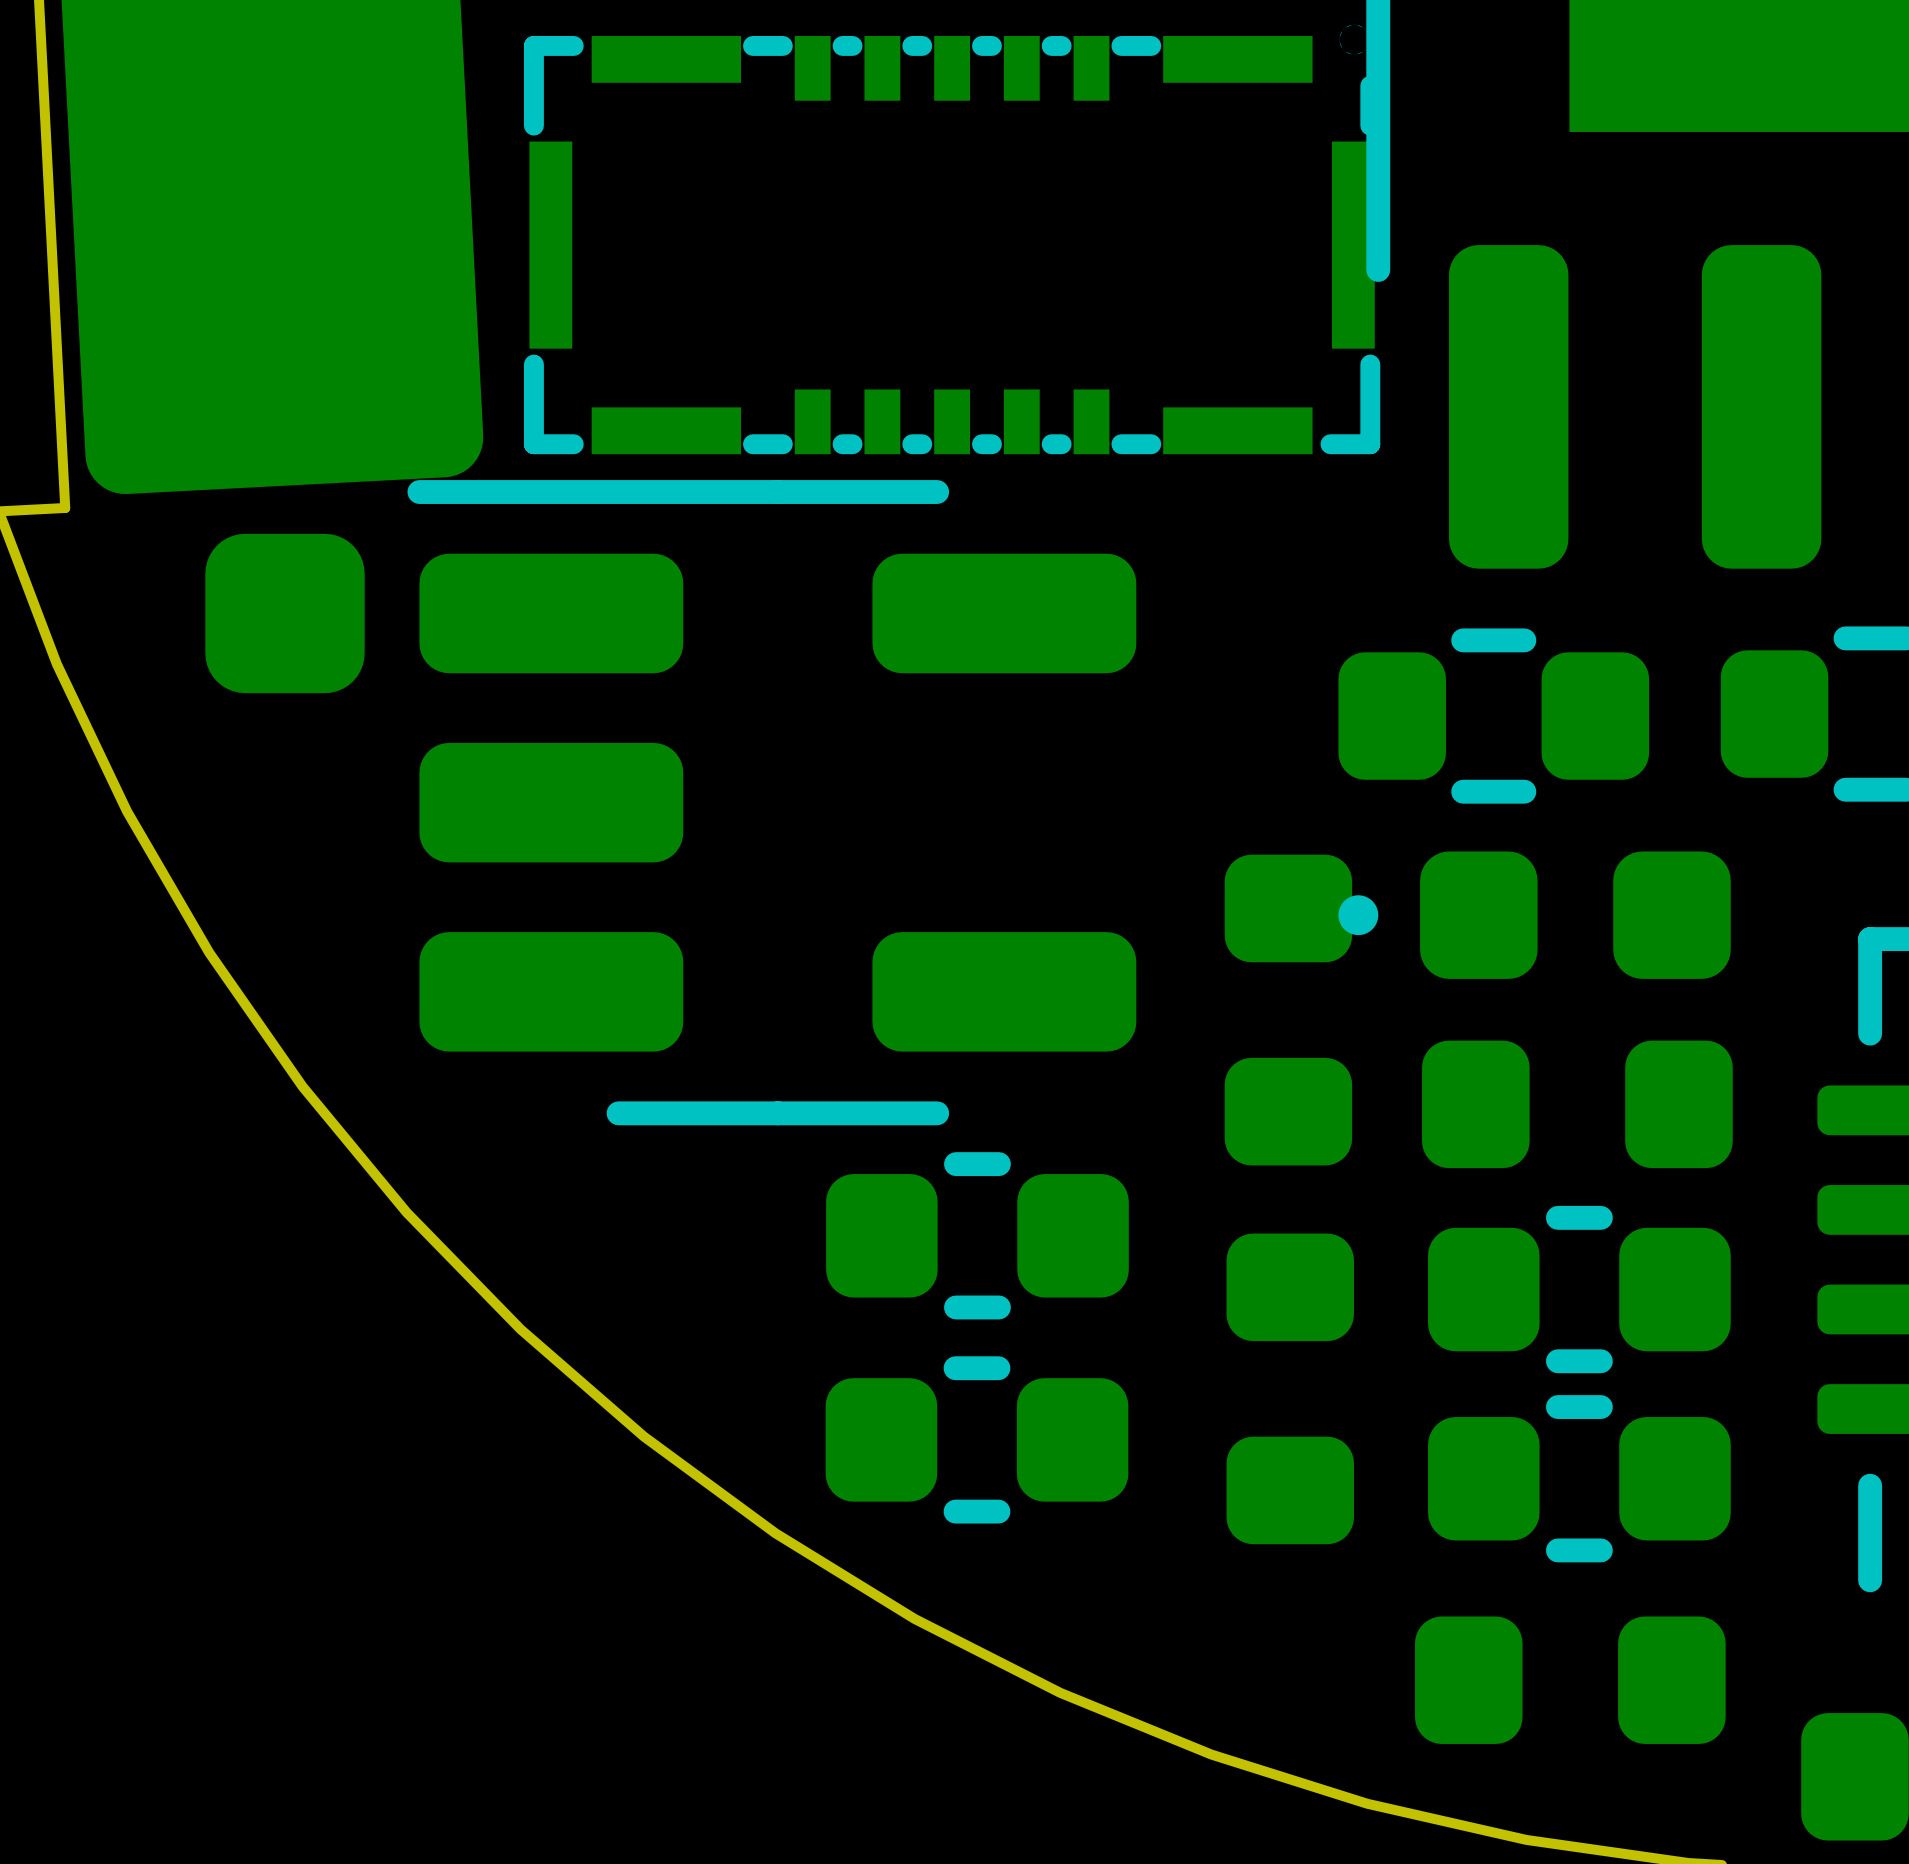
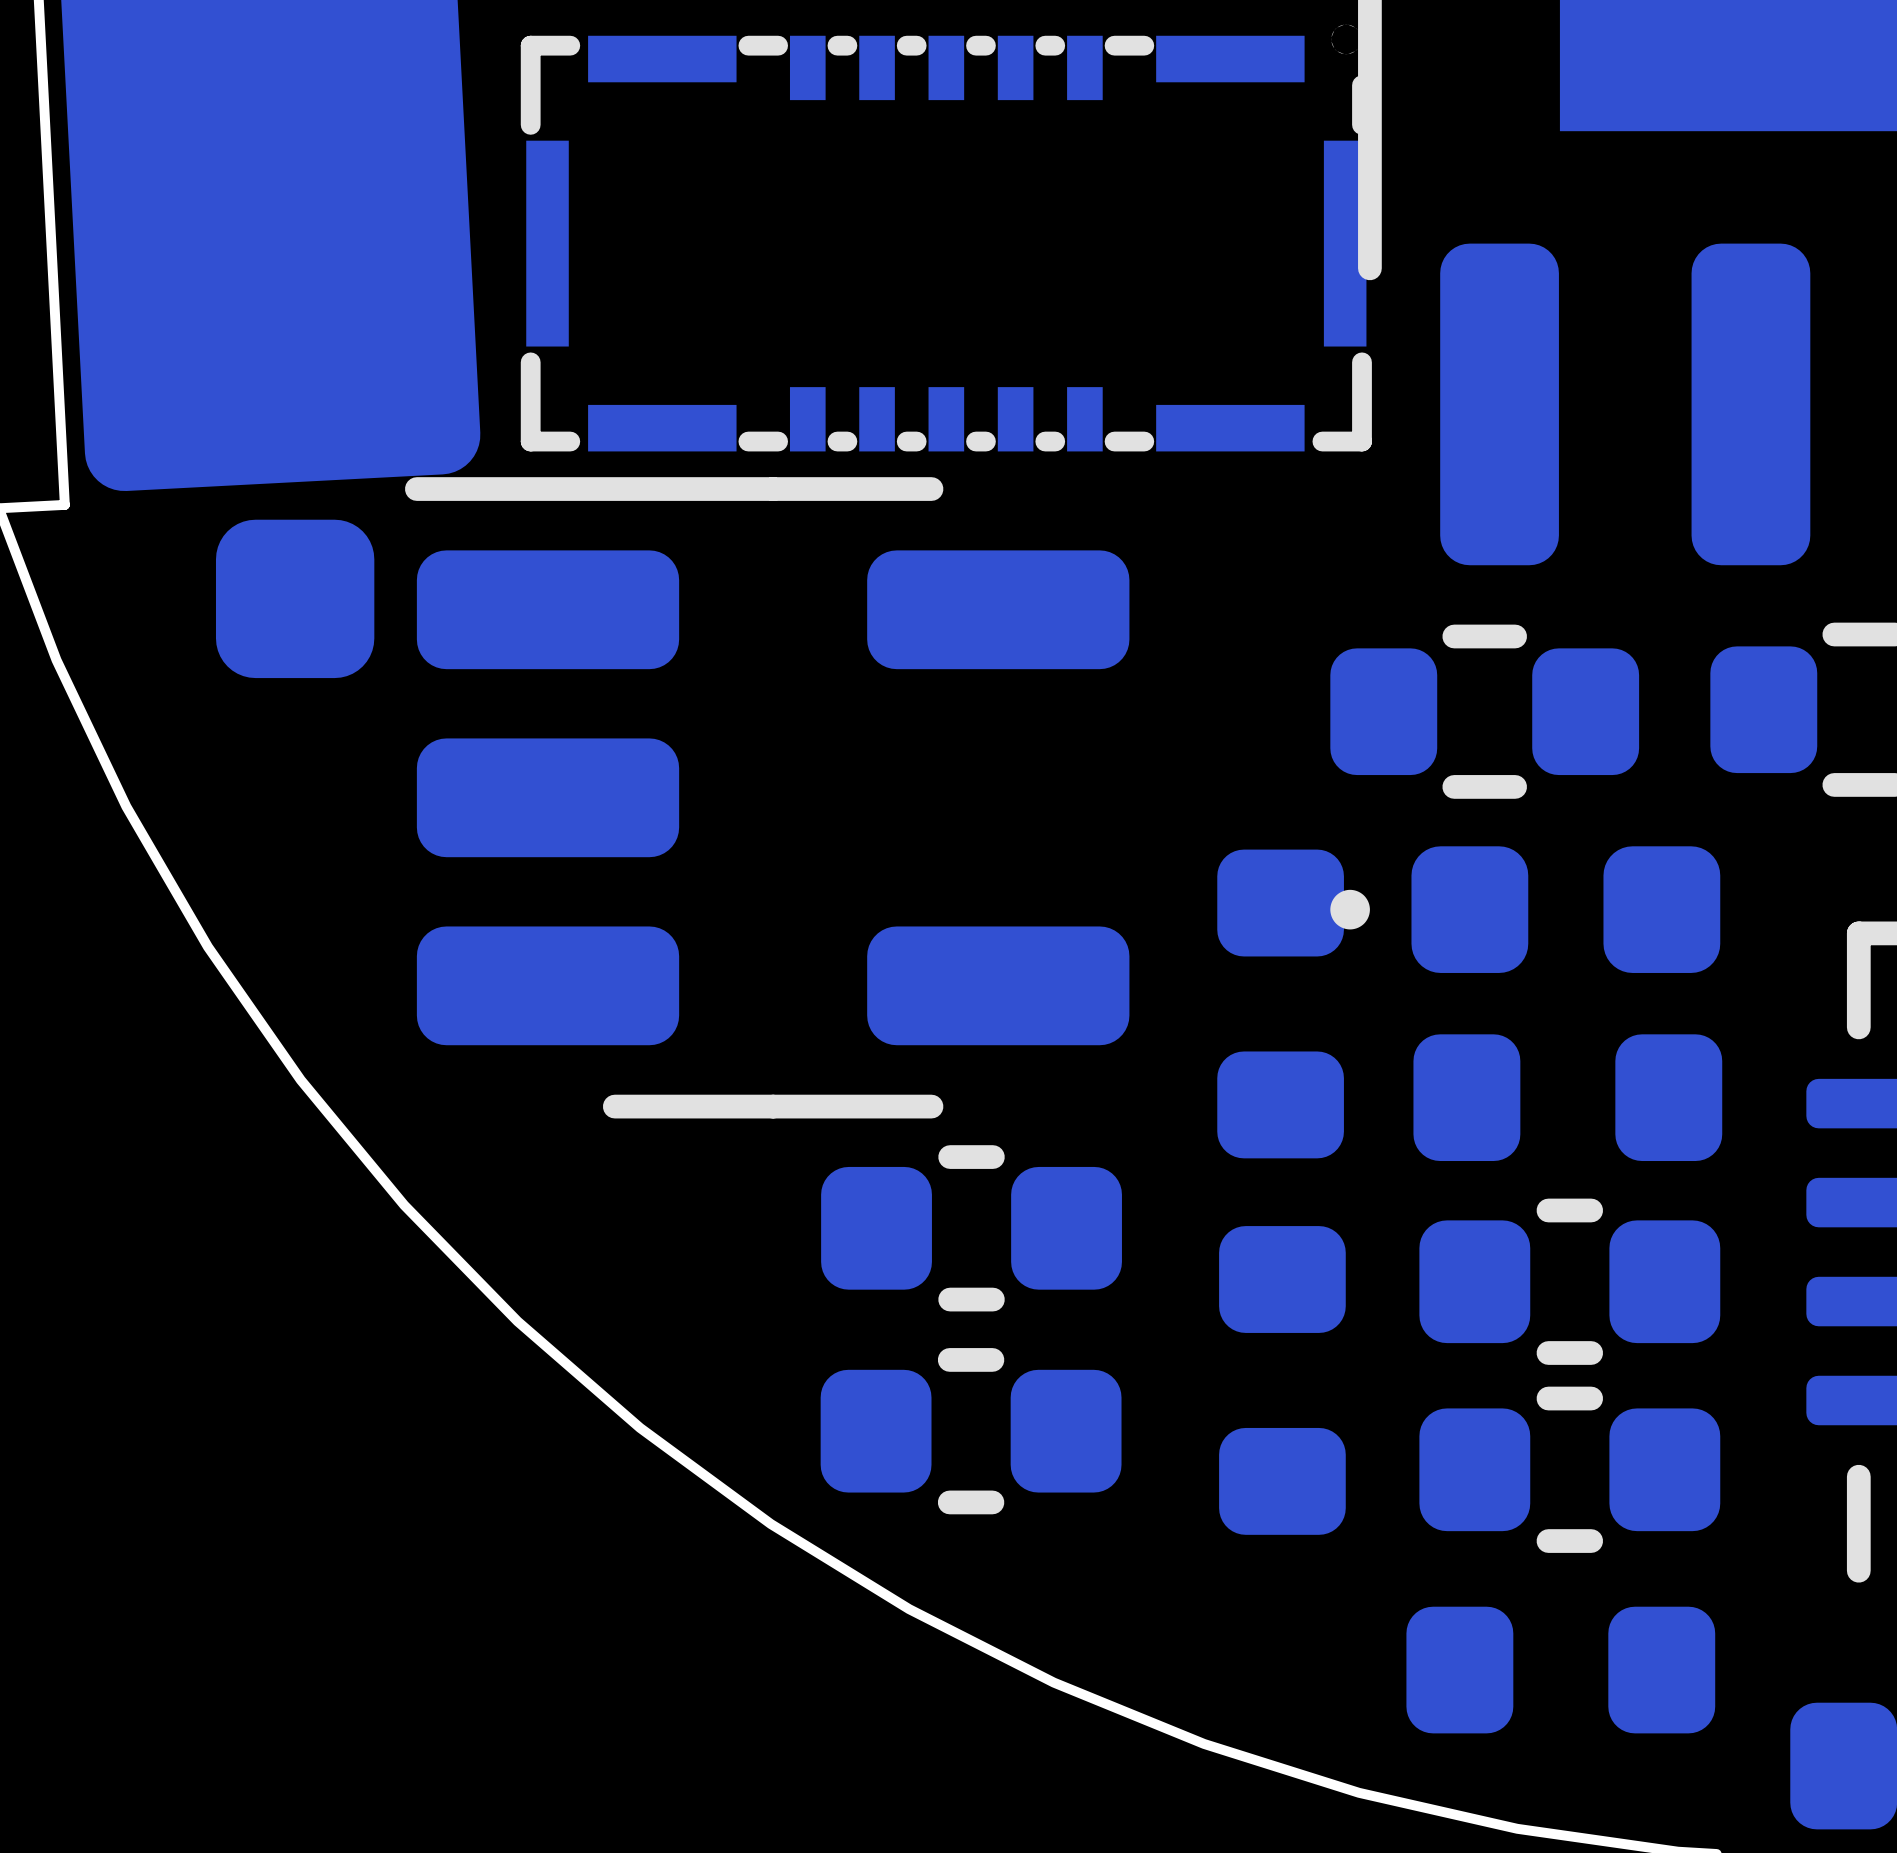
part position: (285, 613) -> (295, 598)

